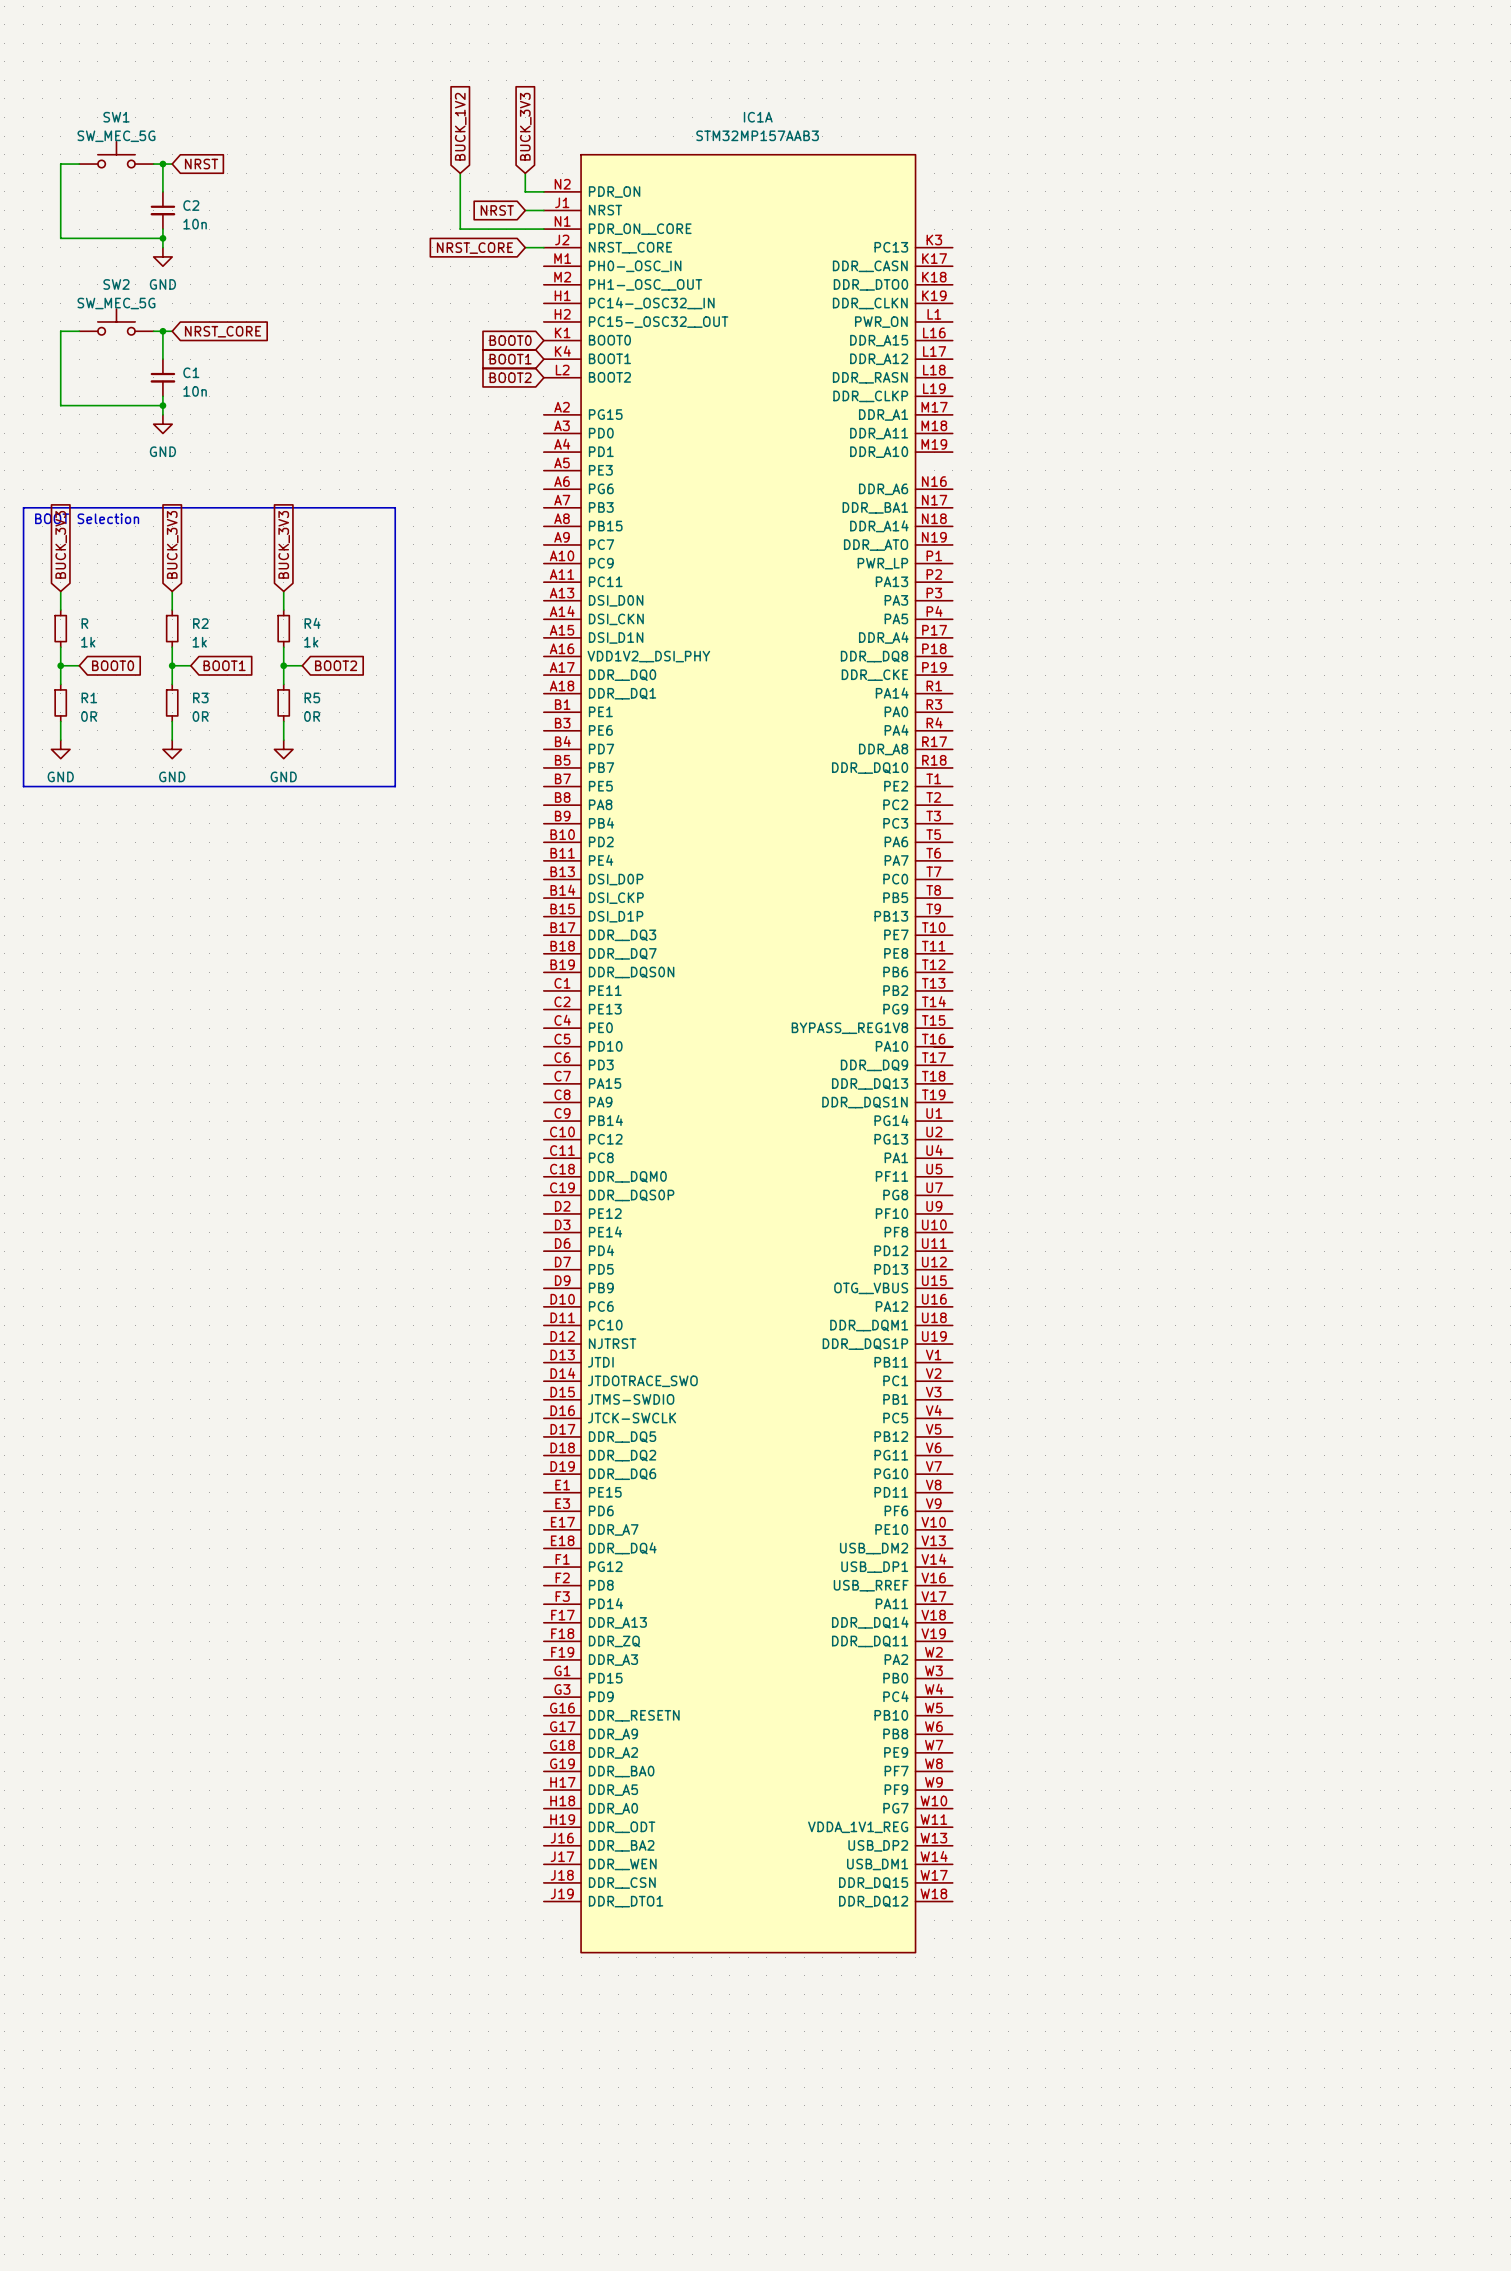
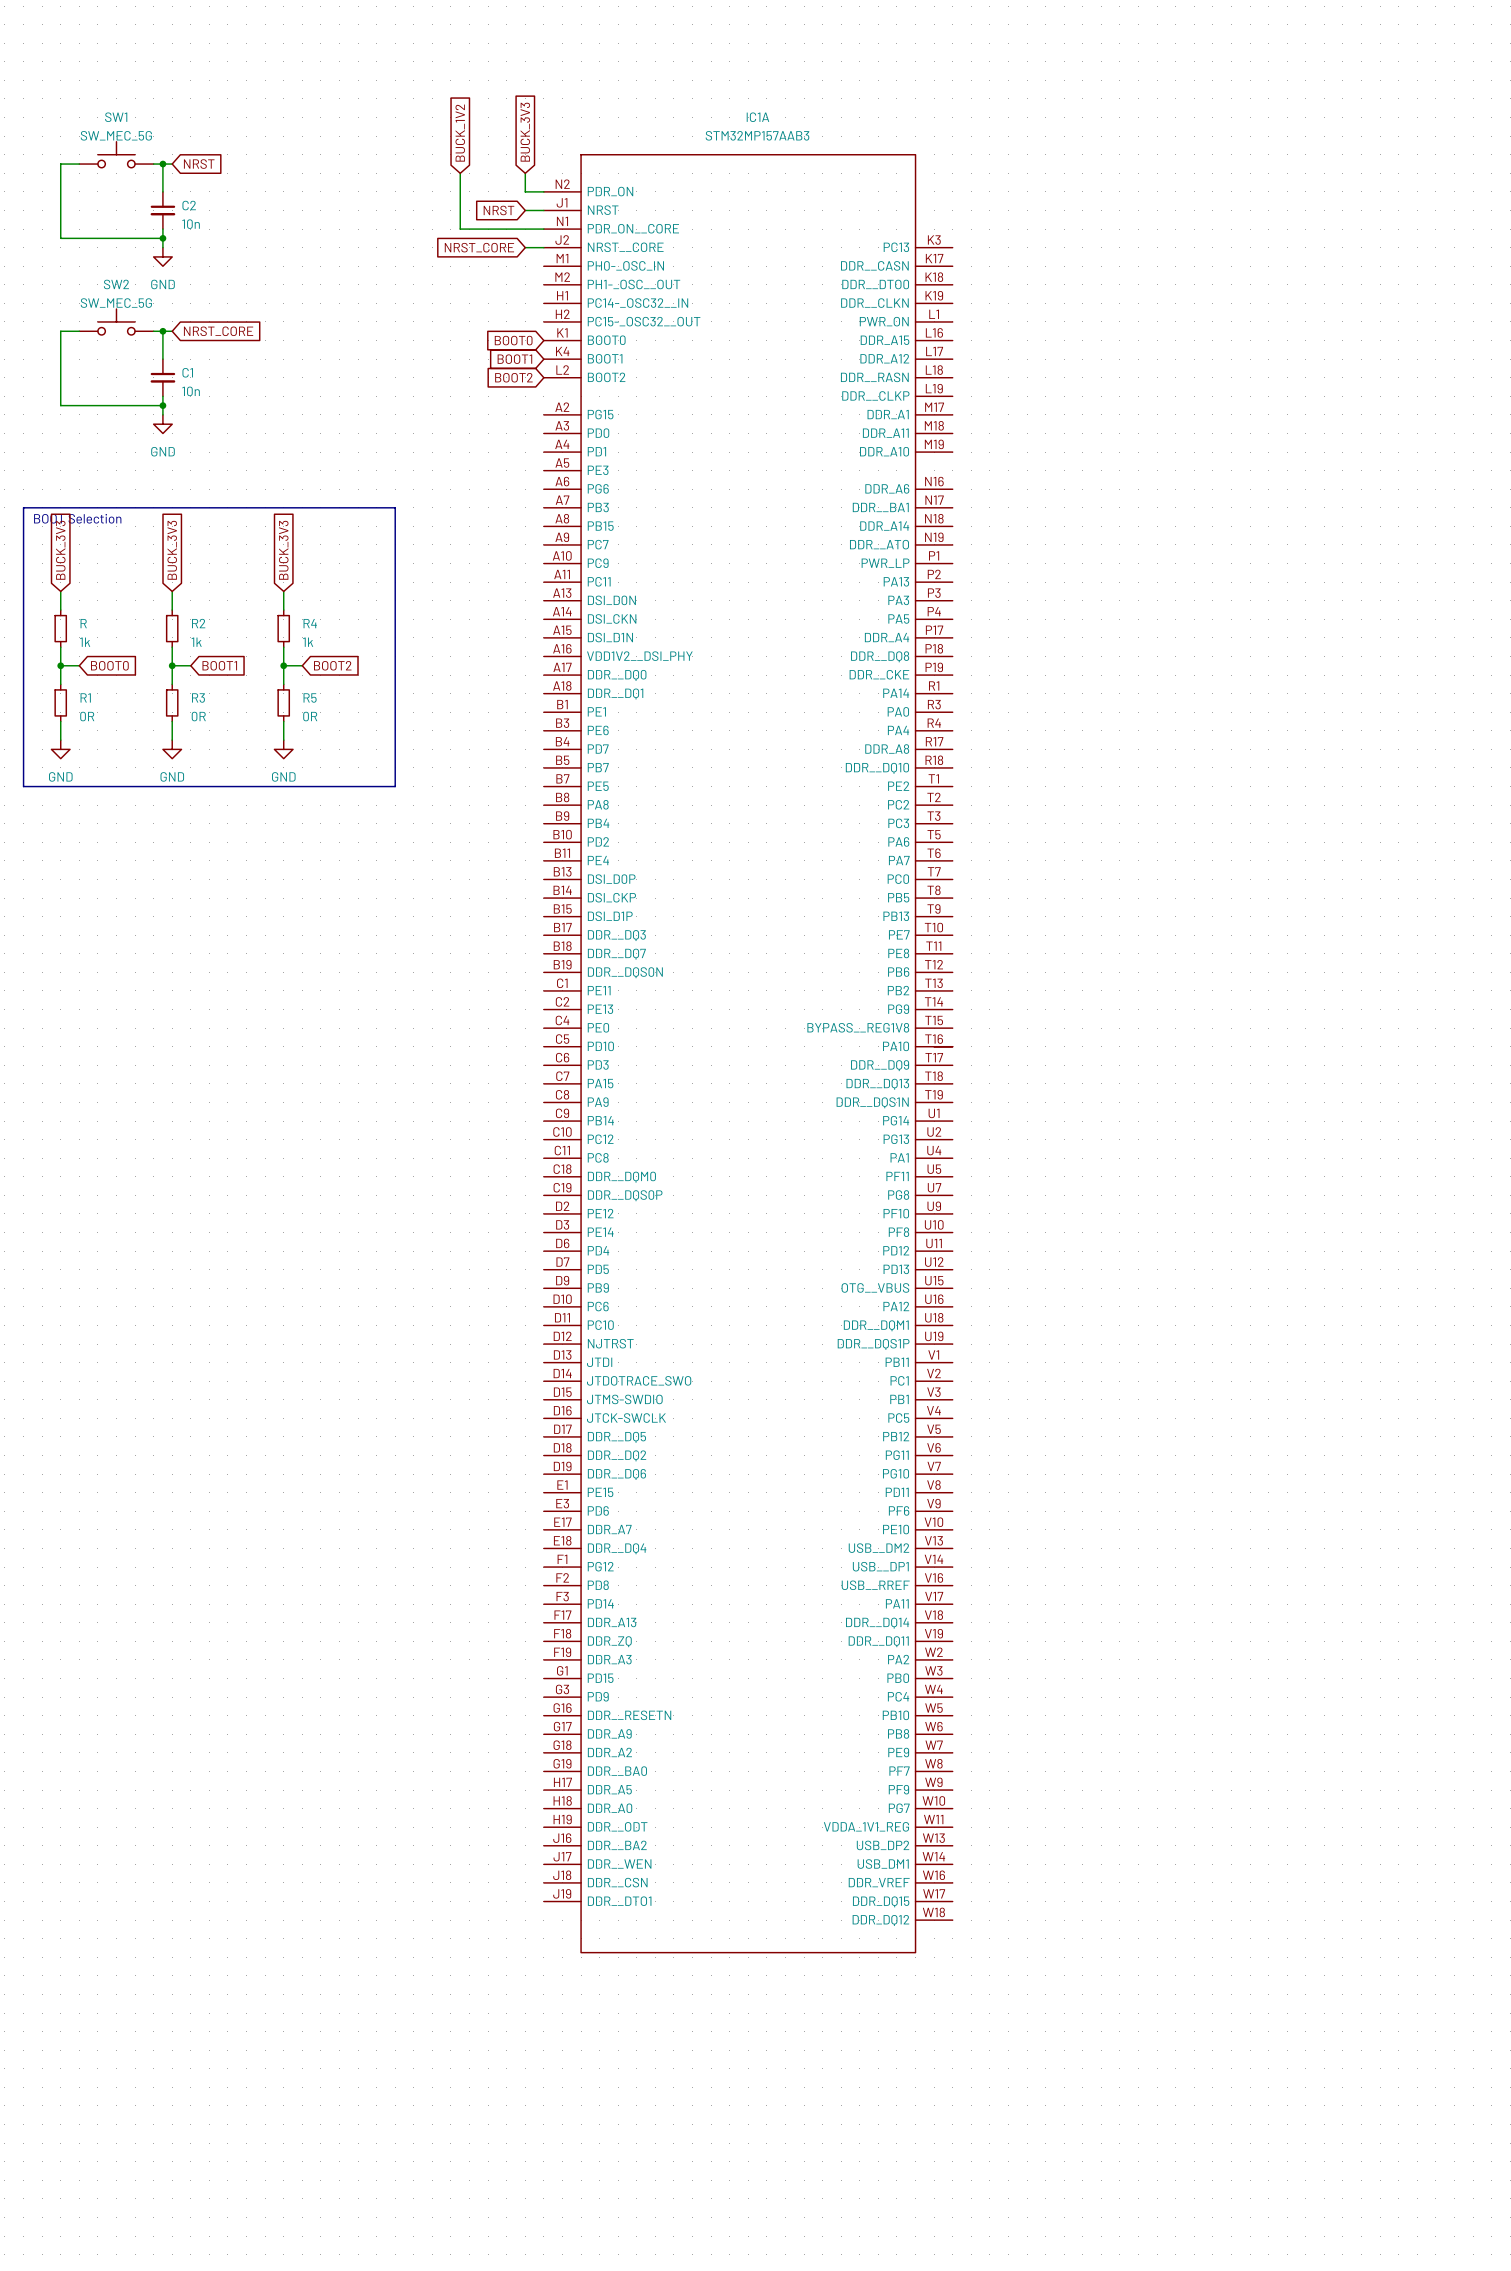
IC1A symbol: [543, 154, 953, 1953] -> [543, 154, 953, 1953]

